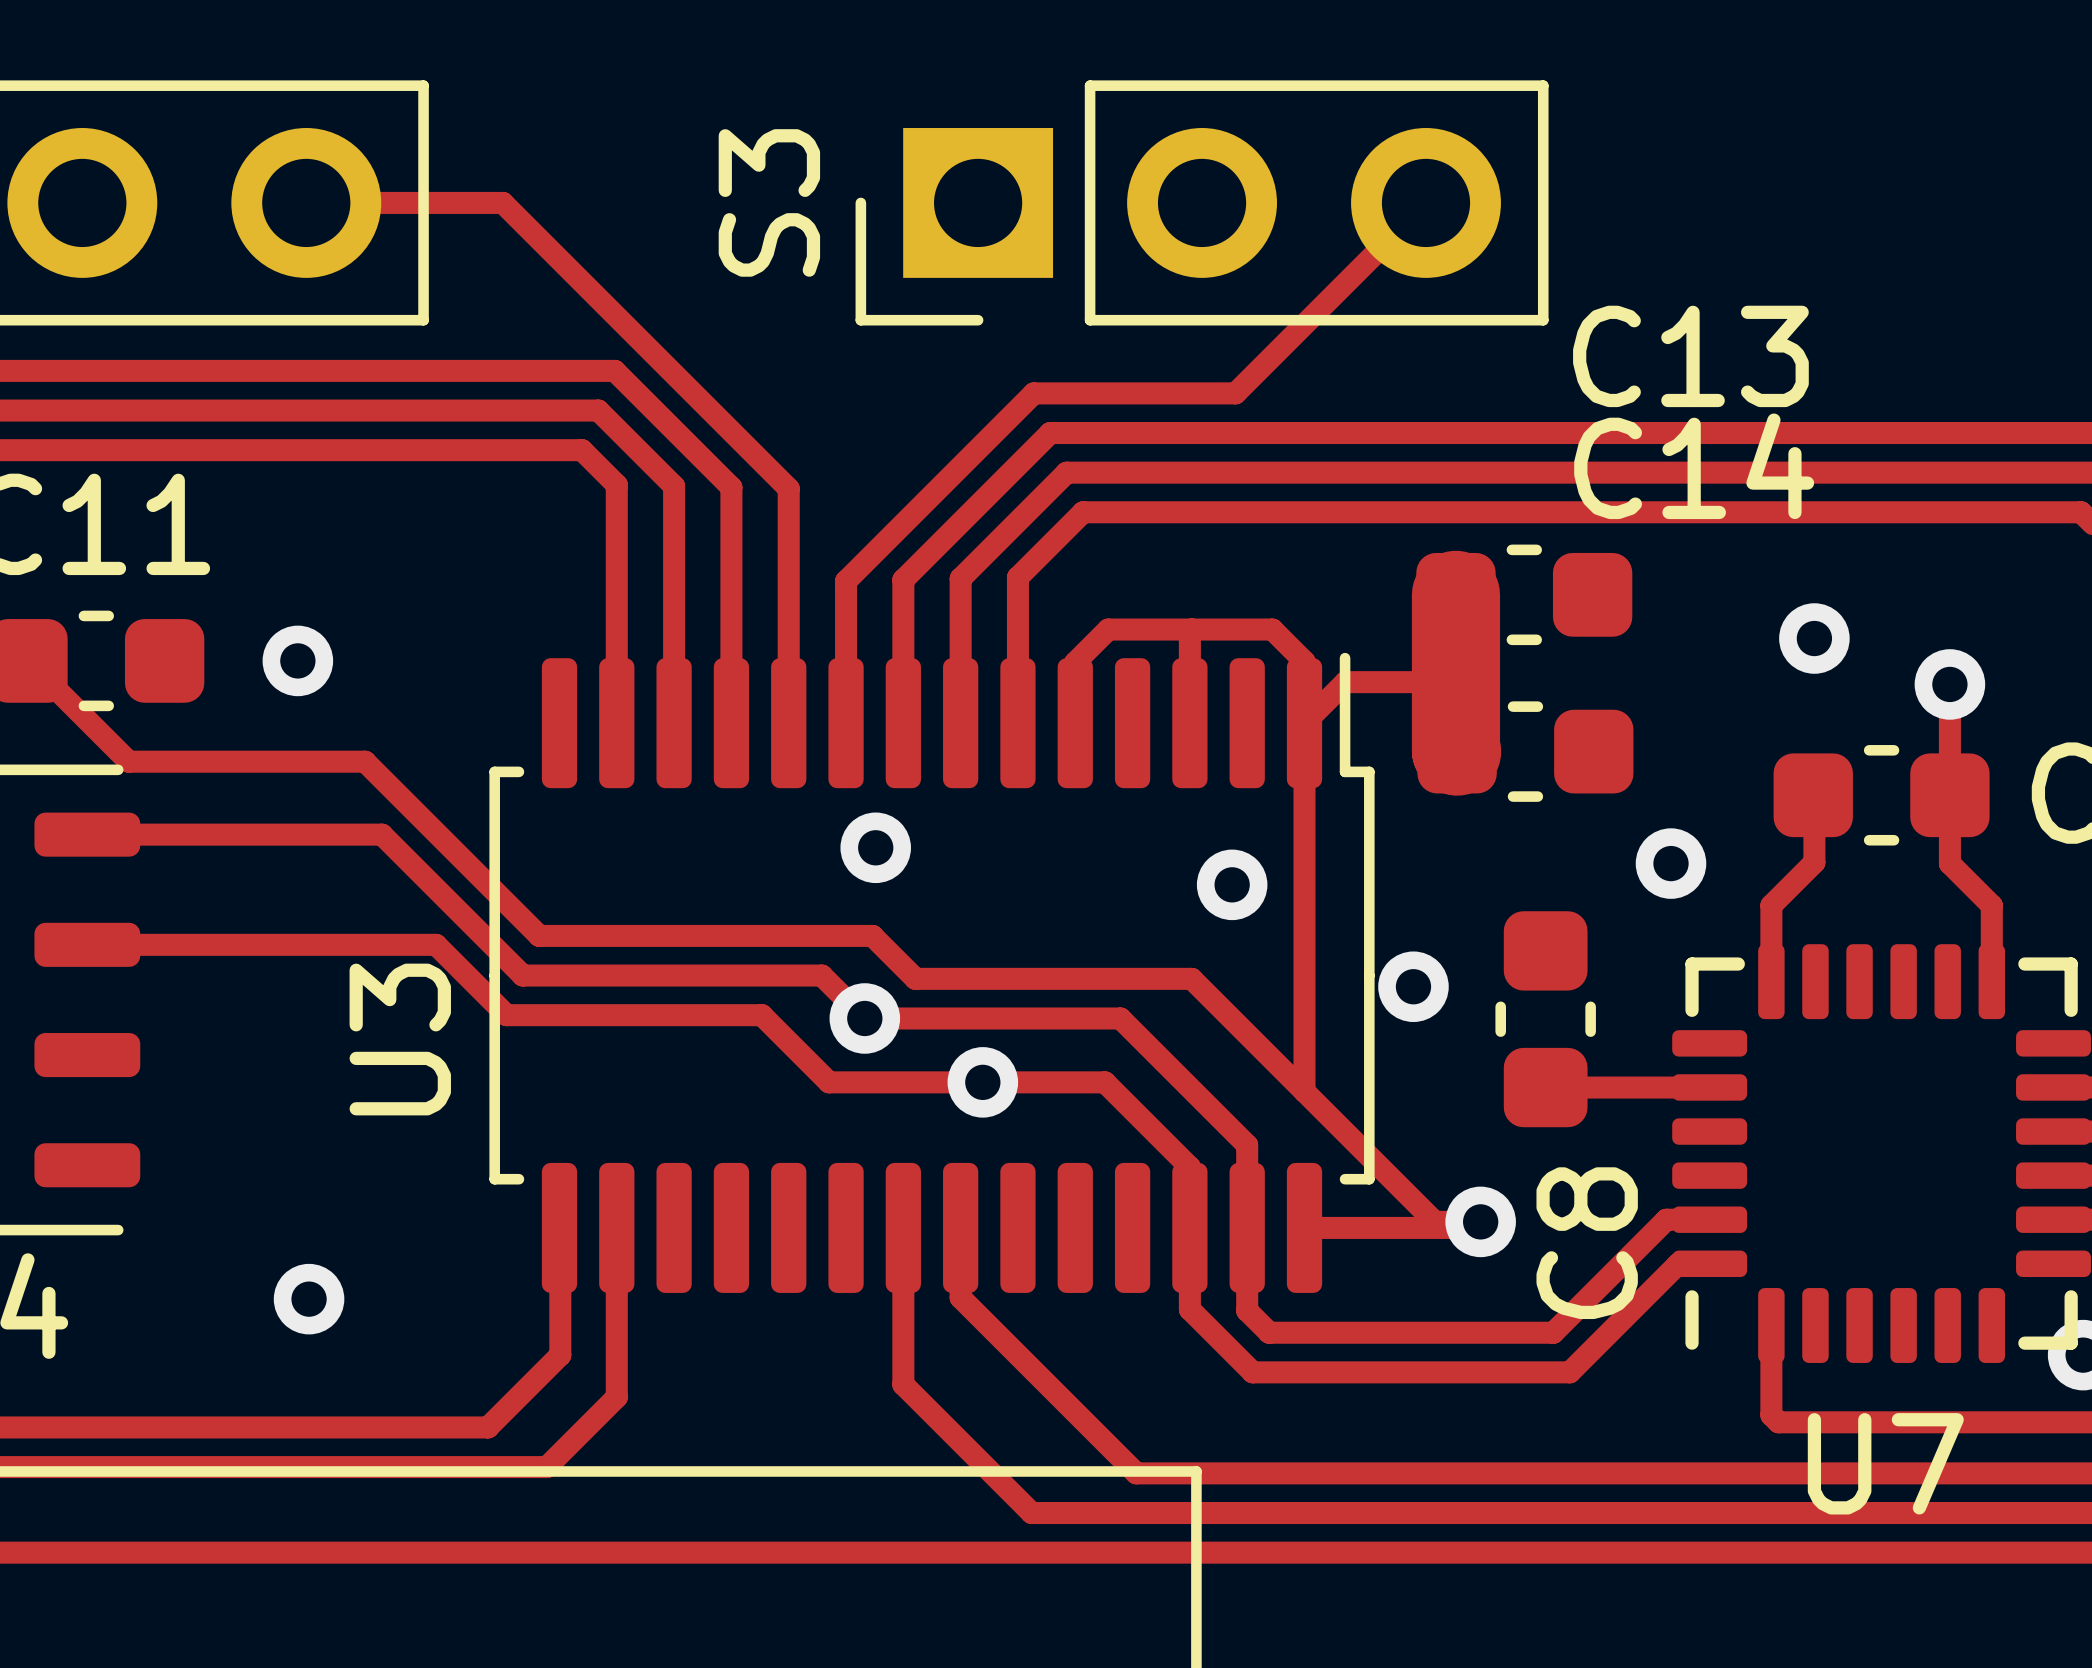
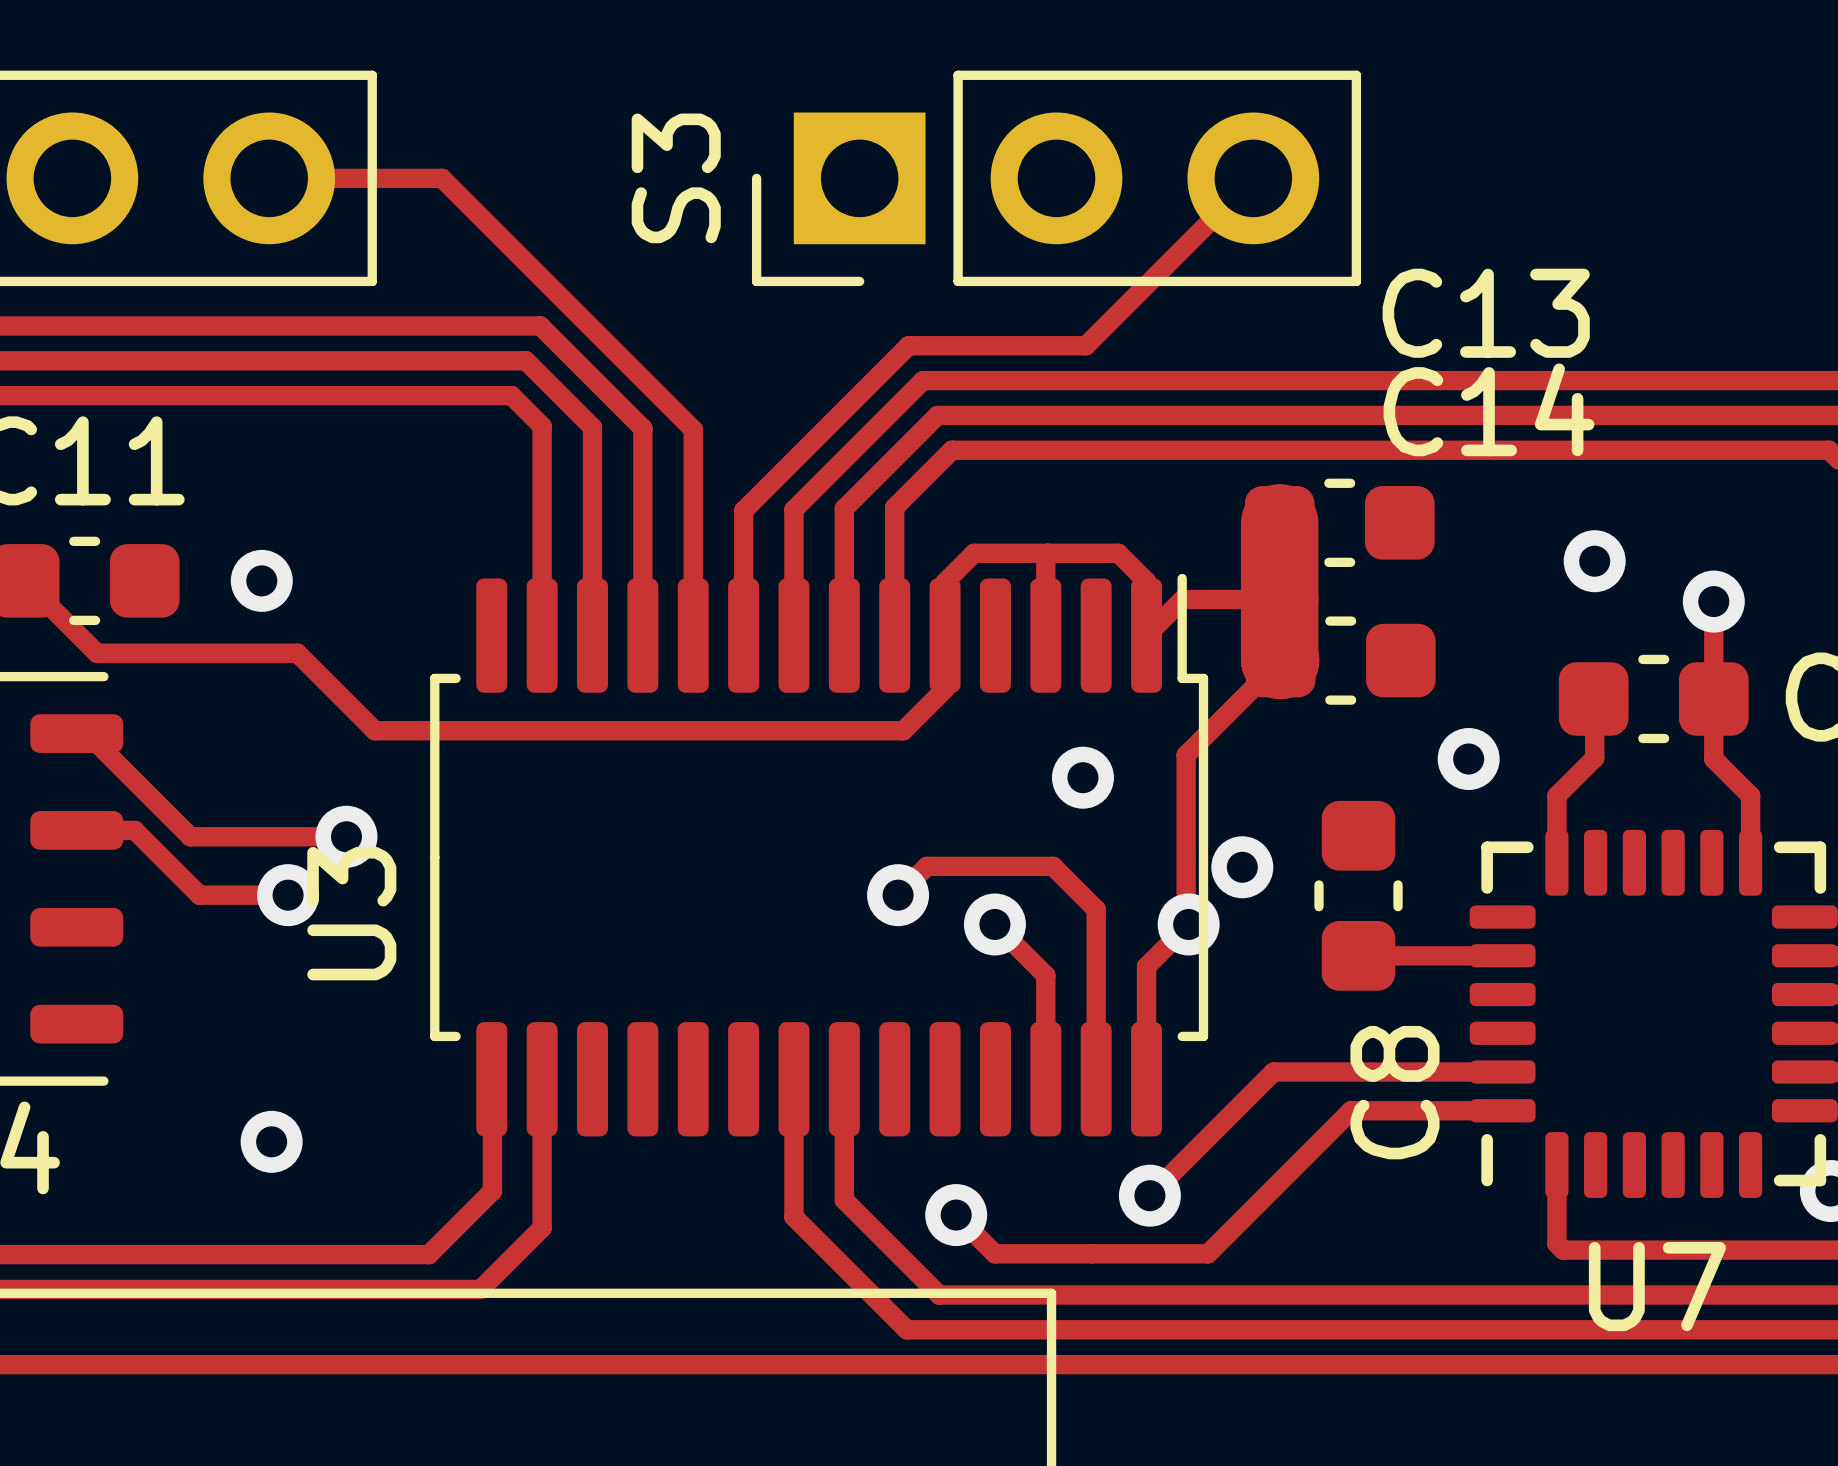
track: (1304, 723) (1304, 1091) -> none
track: (110, 743) (128, 761) (365, 761) (539, 935) (872, 935) (915, 978) (1191, 978) (1434, 1221) (1480, 1221) (1474, 1227) (1304, 1227) -> (96, 653) (297, 653) (375, 730) (903, 730) (945, 688) (945, 635)
track: none -> (1280, 660) (1186, 755) (1186, 921) (1188, 924) (1146, 966) (1146, 1079)
track: (99, 834) (382, 834) (522, 975) (821, 975) (864, 1018) (1120, 1018) (1247, 1145) -> (87, 733) (190, 836) (346, 836)
via: (875, 847) -> none
track: (153, 944) (436, 944) (506, 1015) (761, 1015) (829, 1082) (1104, 1082) (1189, 1167) -> (134, 830) (199, 895) (288, 895)
via: none -> (346, 836)
via: none -> (288, 895)
via: (864, 1018) -> none
track: none -> (898, 895) (926, 866) (1053, 866) (1096, 909) (1096, 1006)
track: none -> (994, 924) (1045, 975) (1045, 1025)
via: none -> (994, 924)
via: none -> (1188, 924)
via position: (982, 1082) -> (898, 895)
track: (1666, 1219) (1553, 1332) (1269, 1332) (1247, 1310) (1247, 1227) -> (1464, 1072) (1273, 1072) (1149, 1195)
via: (1480, 1221) -> none
track: (1189, 1227) (1189, 1309) (1252, 1372) (1569, 1372) (1678, 1263) -> (956, 1215) (994, 1253) (1208, 1253) (1351, 1110) (1475, 1110)
track: (960, 1297) (1136, 1473) -> (844, 1140) (844, 1200) (939, 1294) (998, 1294)
via: none -> (1149, 1195)
via: none -> (956, 1215)

